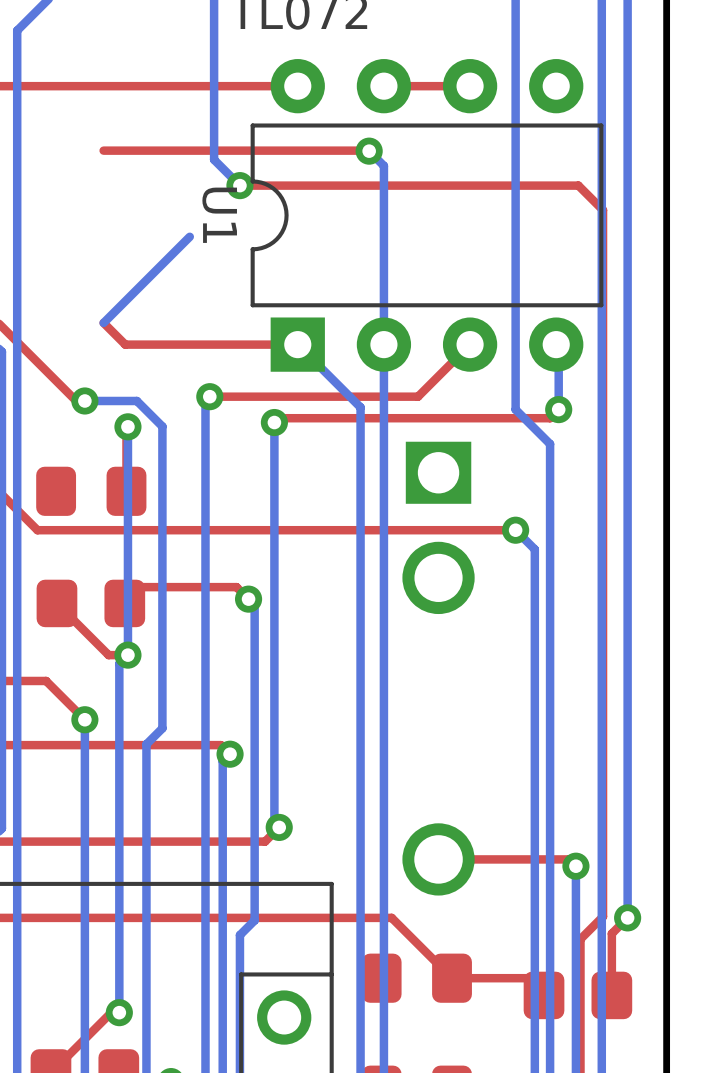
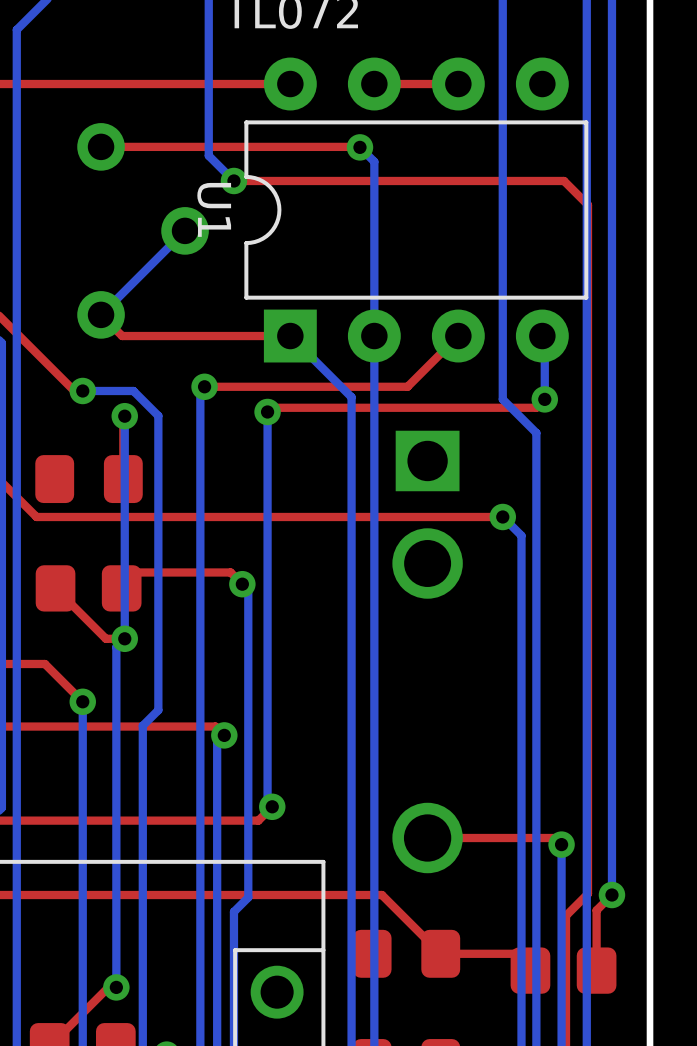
part: none -> (143, 230)

